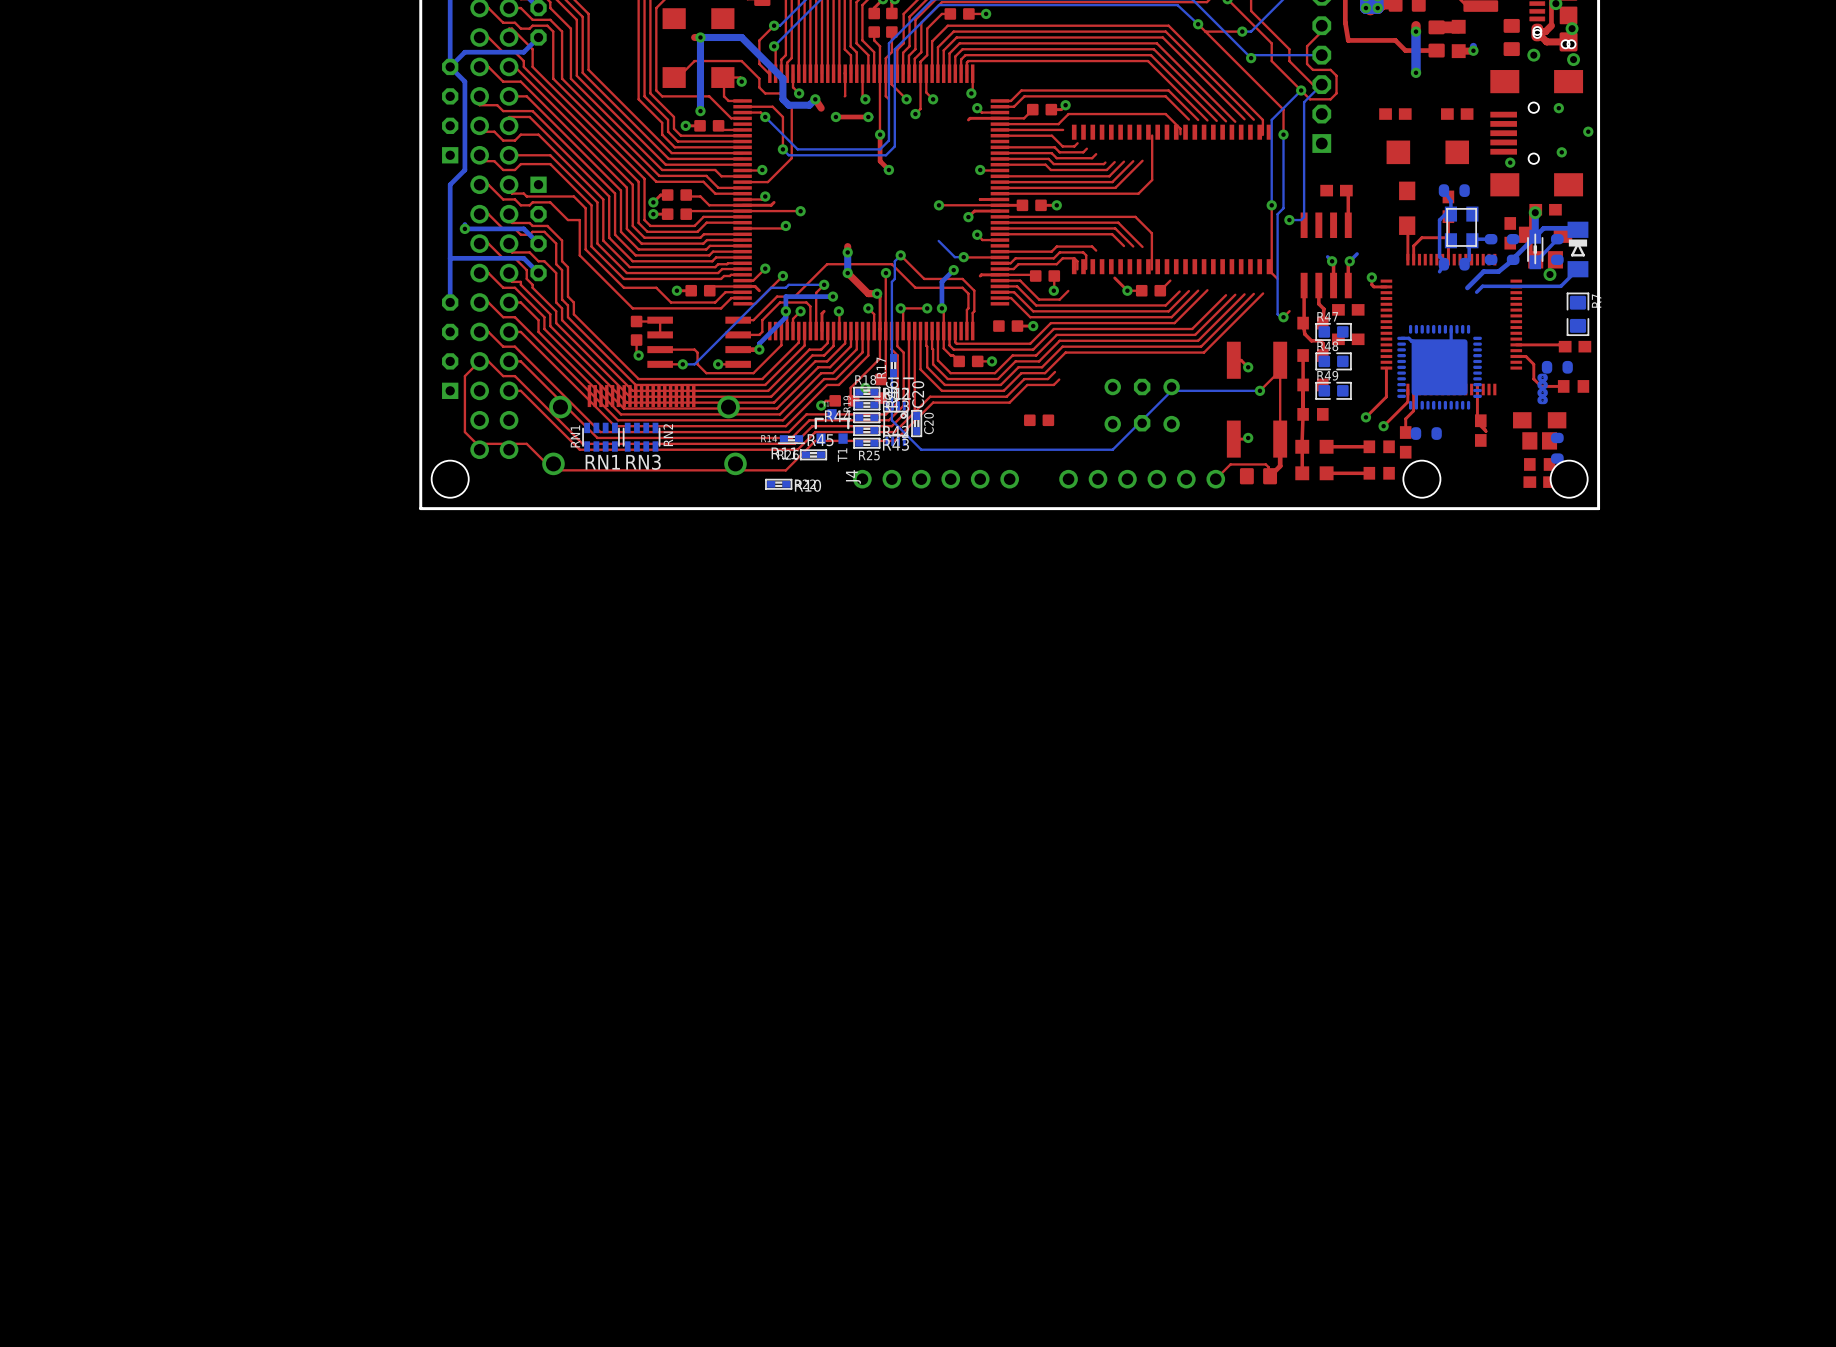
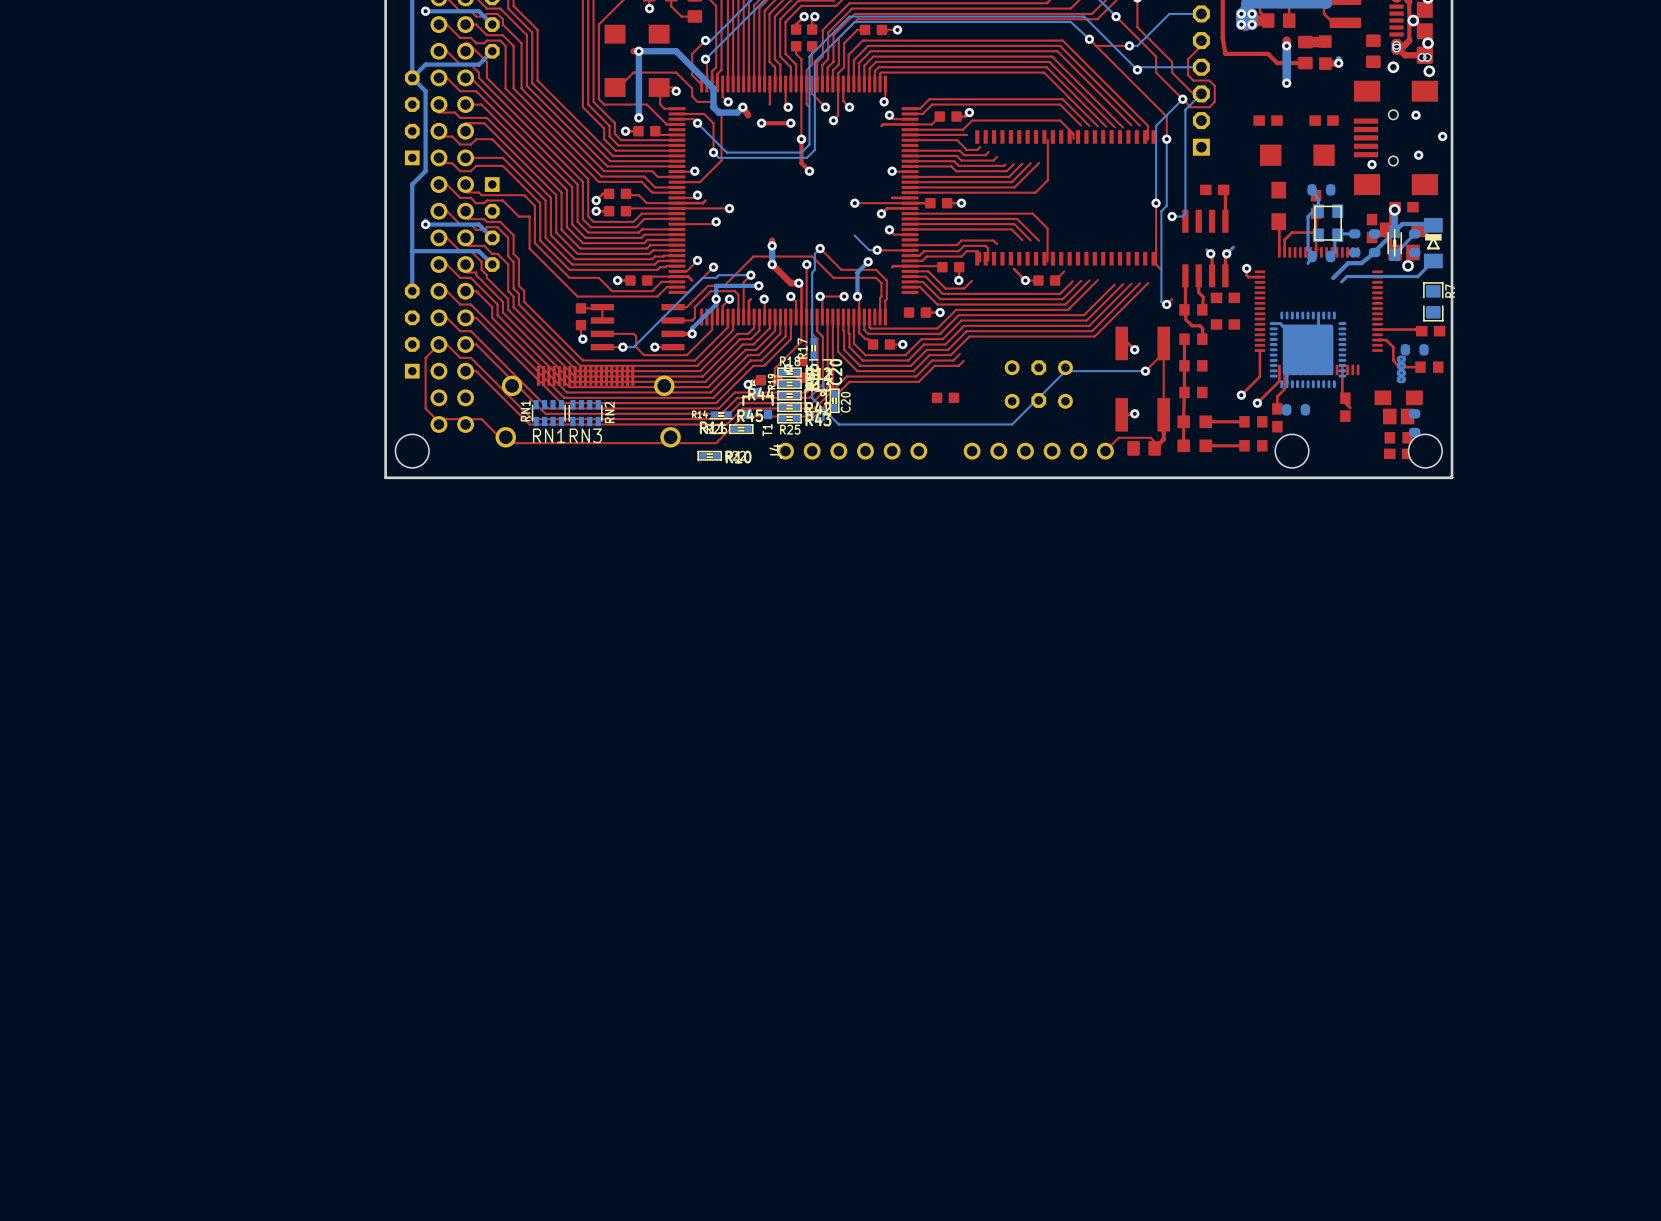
R47: (1333, 331) -> none
R48: (1333, 361) -> none
R49: (1333, 390) -> none

